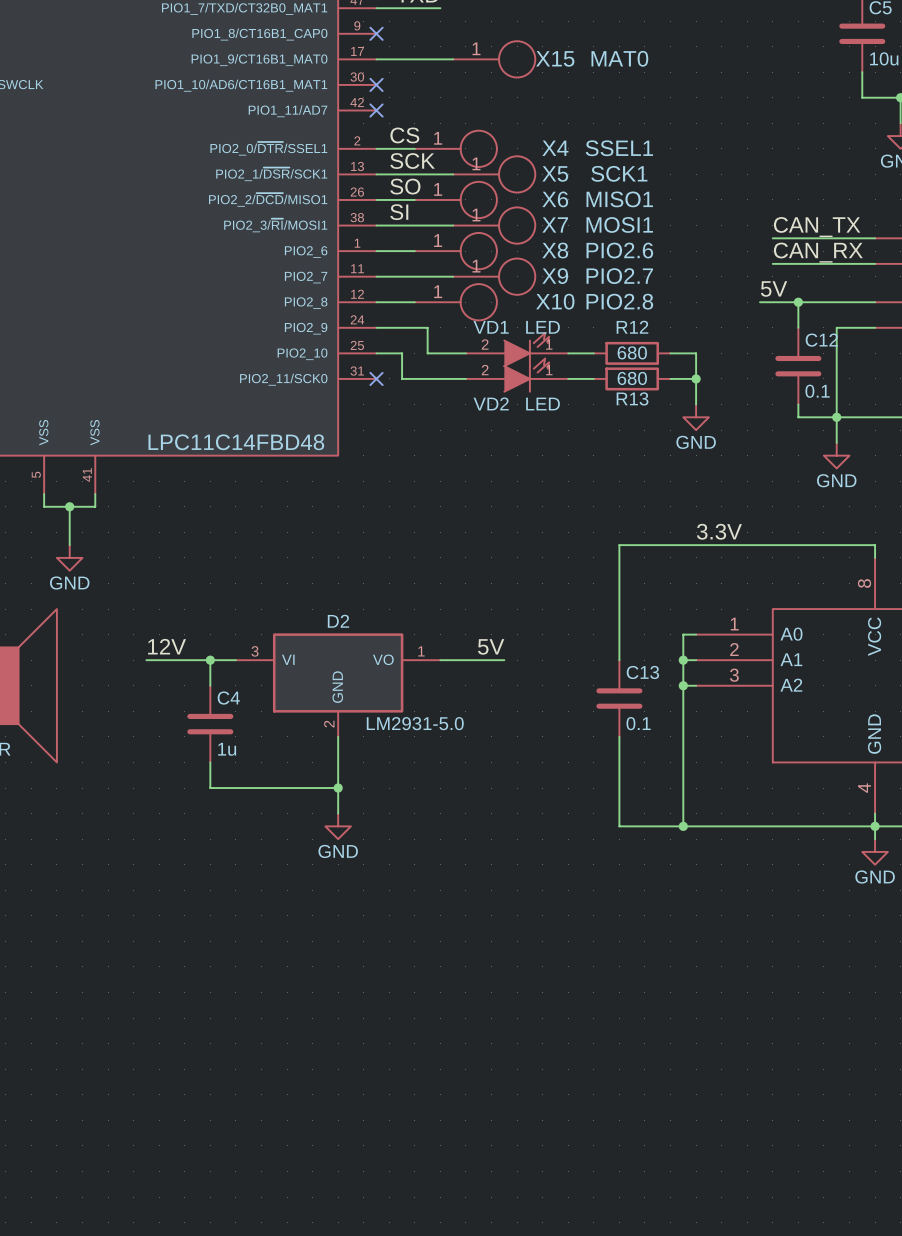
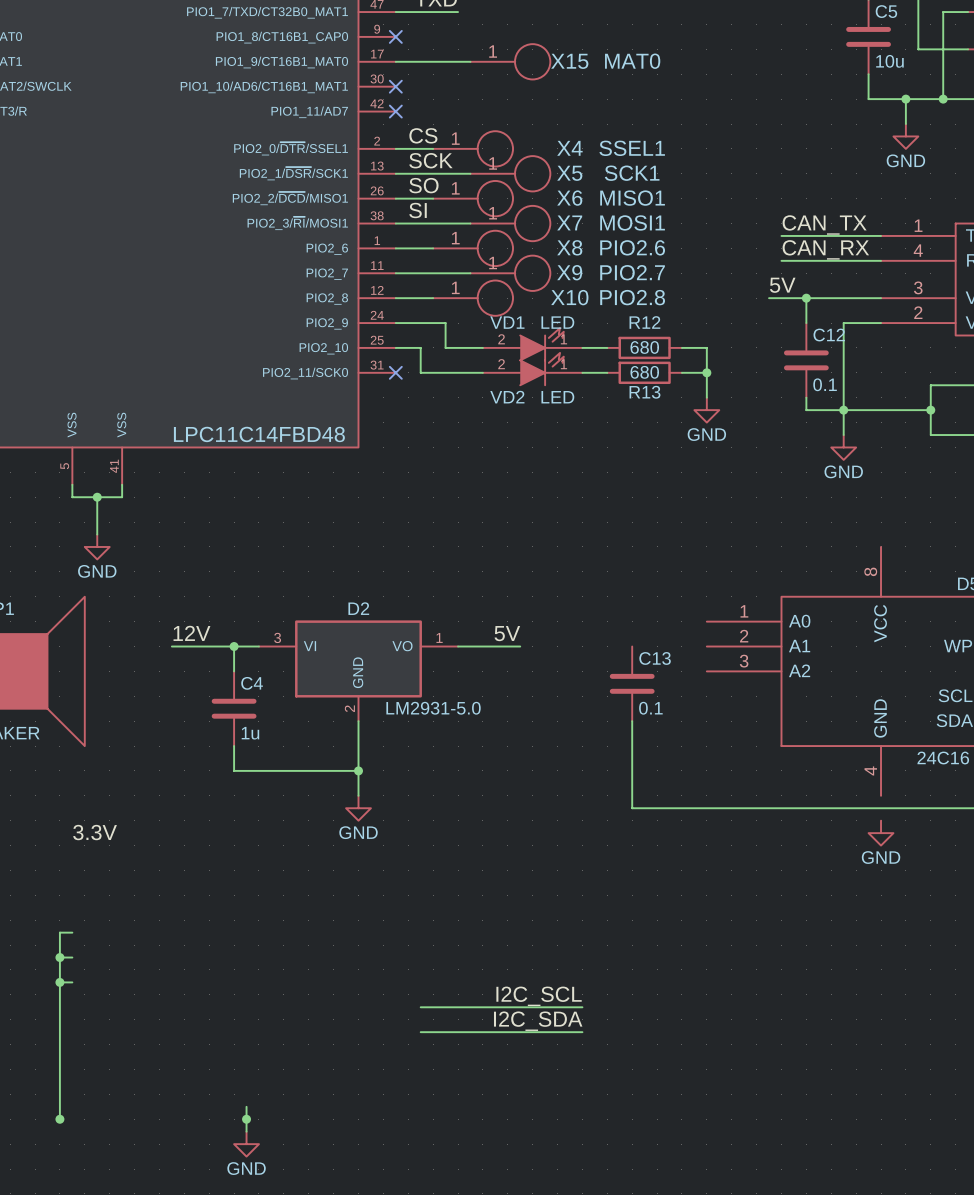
label: 3.3V (719, 531) -> none
wire: (875, 557) (875, 545) (619, 545) (619, 660) -> none
wire: (696, 634) (683, 634) (683, 826) -> none
wire: (683, 660) (696, 660) -> none
junction: (683, 660) -> none
wire: (683, 685) (696, 685) -> none
junction: (683, 685) -> none
wire: (875, 813) (875, 839) -> none
junction: (683, 826) -> none
junction: (875, 826) -> none
label: none -> 3.3V (95, 832)
wire: none -> (72, 932) (59, 932) (59, 1119)
wire: none -> (59, 957) (72, 957)
junction: none -> (59, 957)
wire: none -> (59, 982) (72, 982)
junction: none -> (59, 982)
label: none -> I2C_SCL (539, 996)
wire: none -> (420, 1007) (582, 1007)
label: none -> I2C_SDA (538, 1021)
wire: none -> (420, 1032) (582, 1032)
wire: none -> (246, 1106) (246, 1131)
junction: none -> (59, 1119)
junction: none -> (246, 1119)
power symbol: none -> GND (246, 1144)

